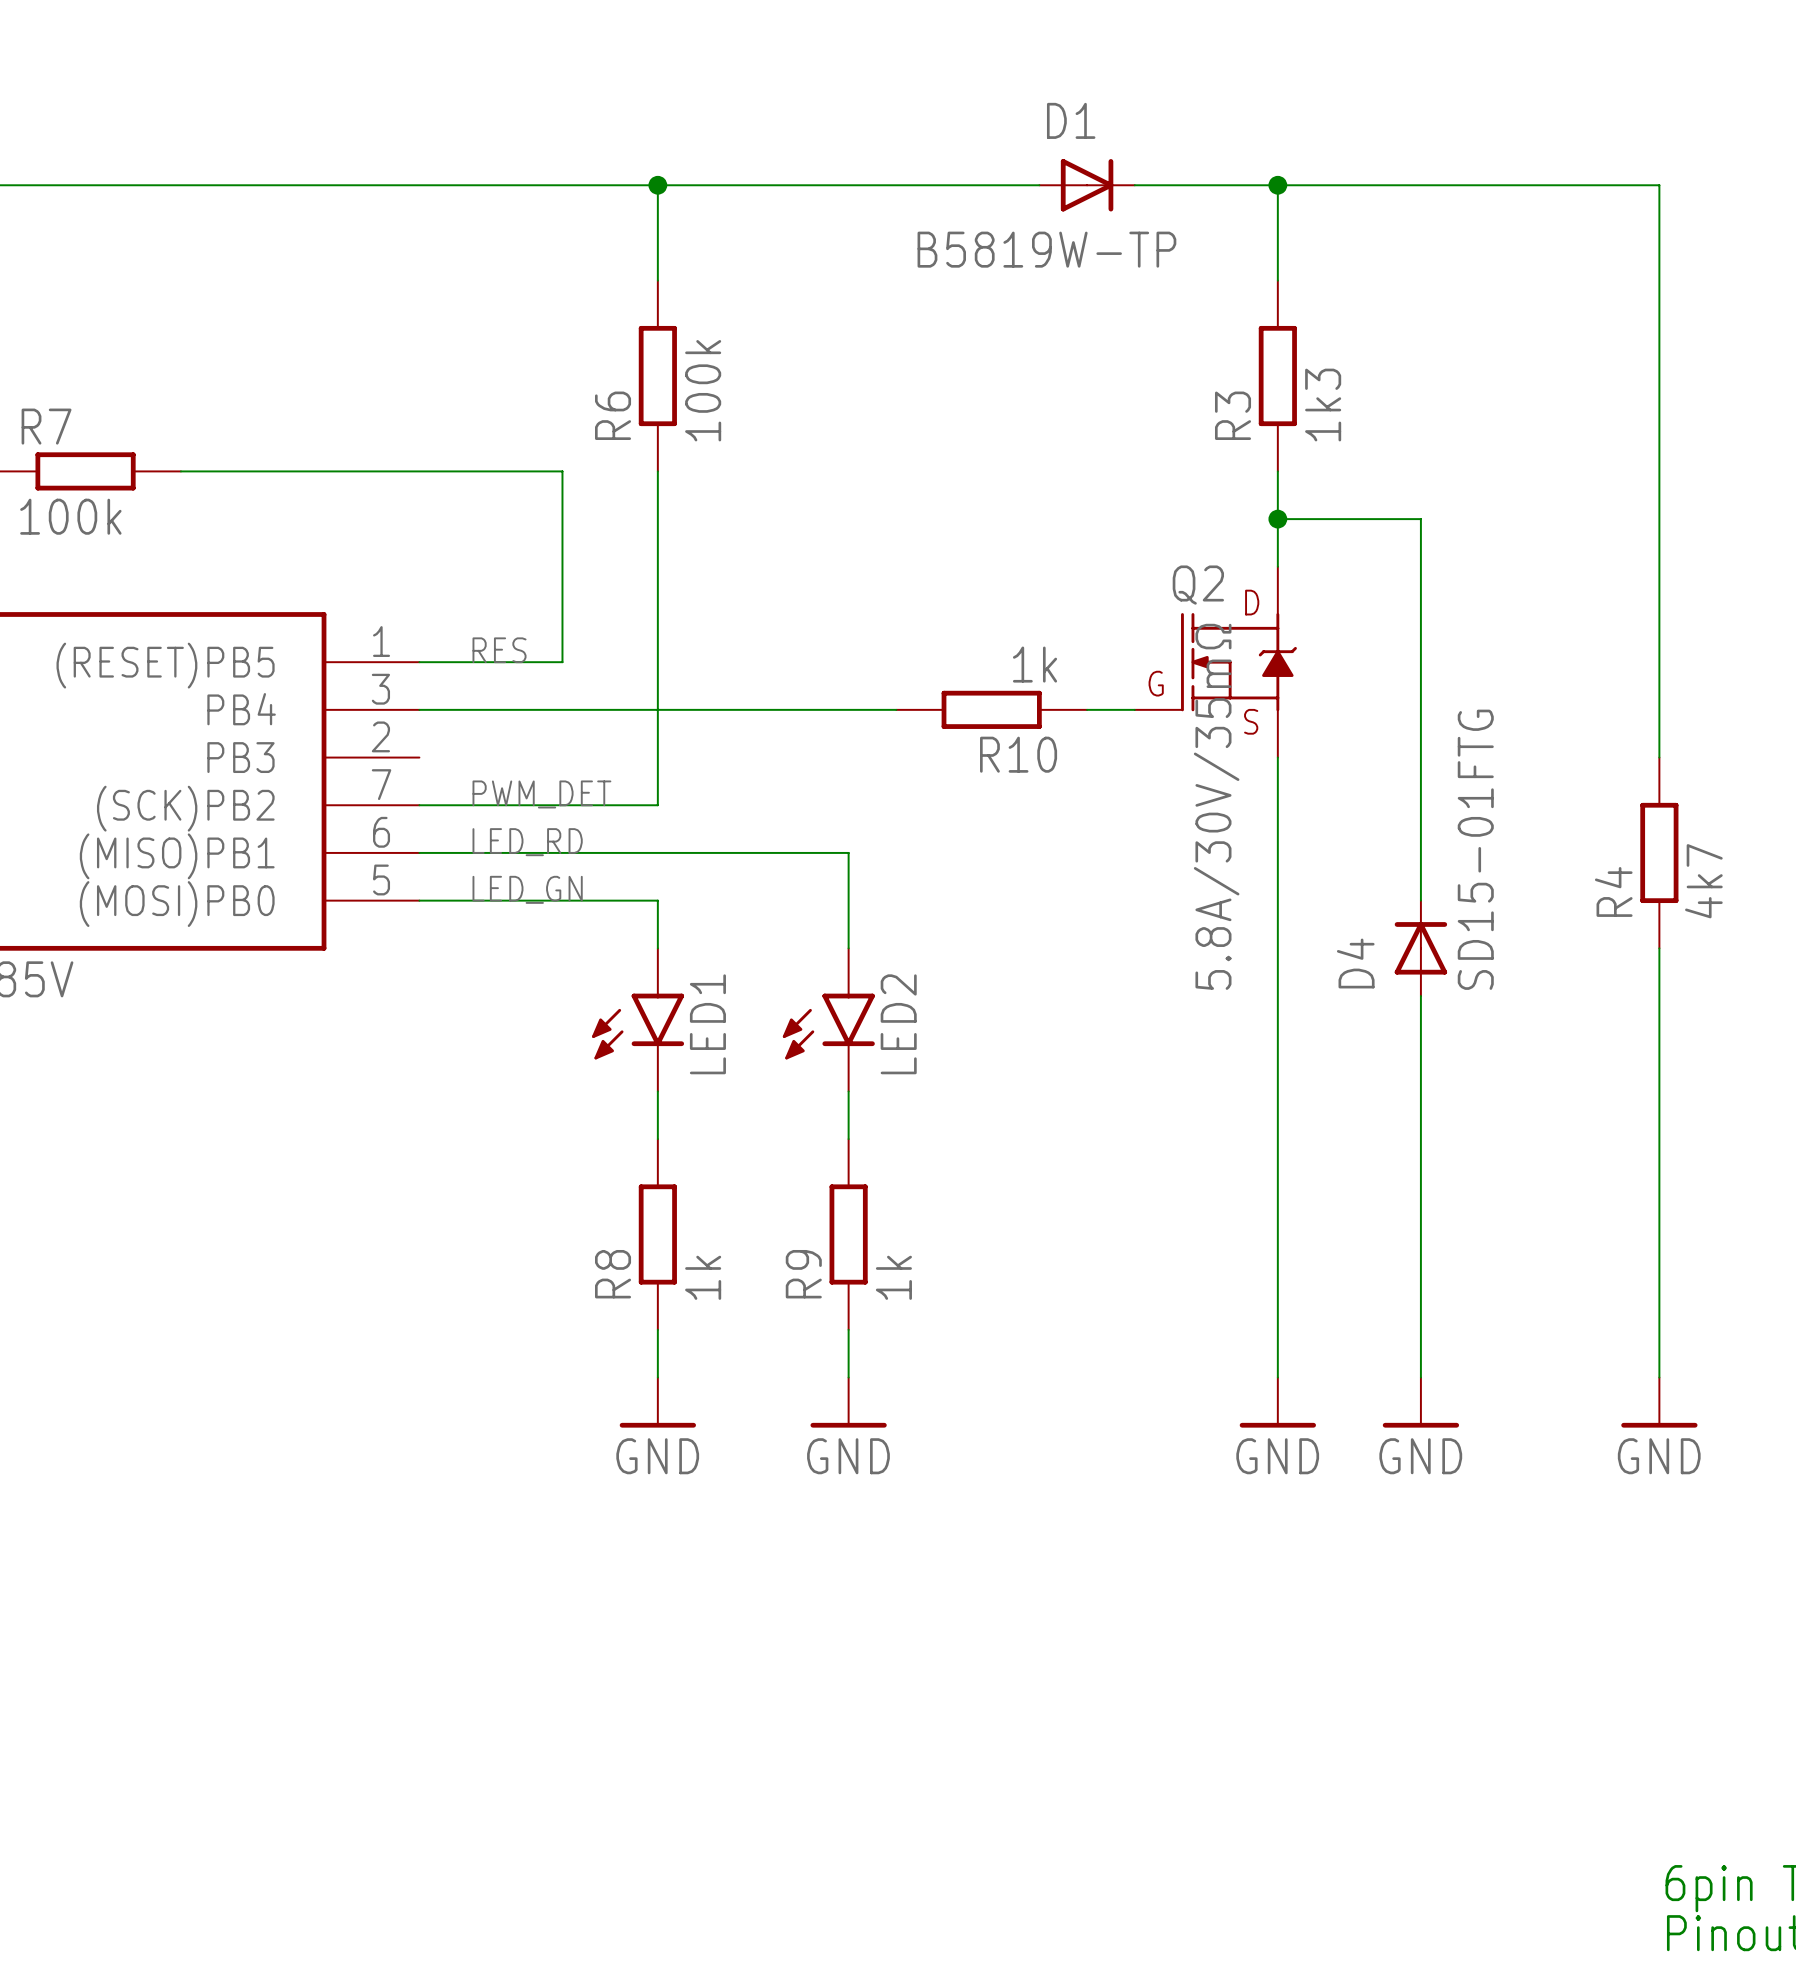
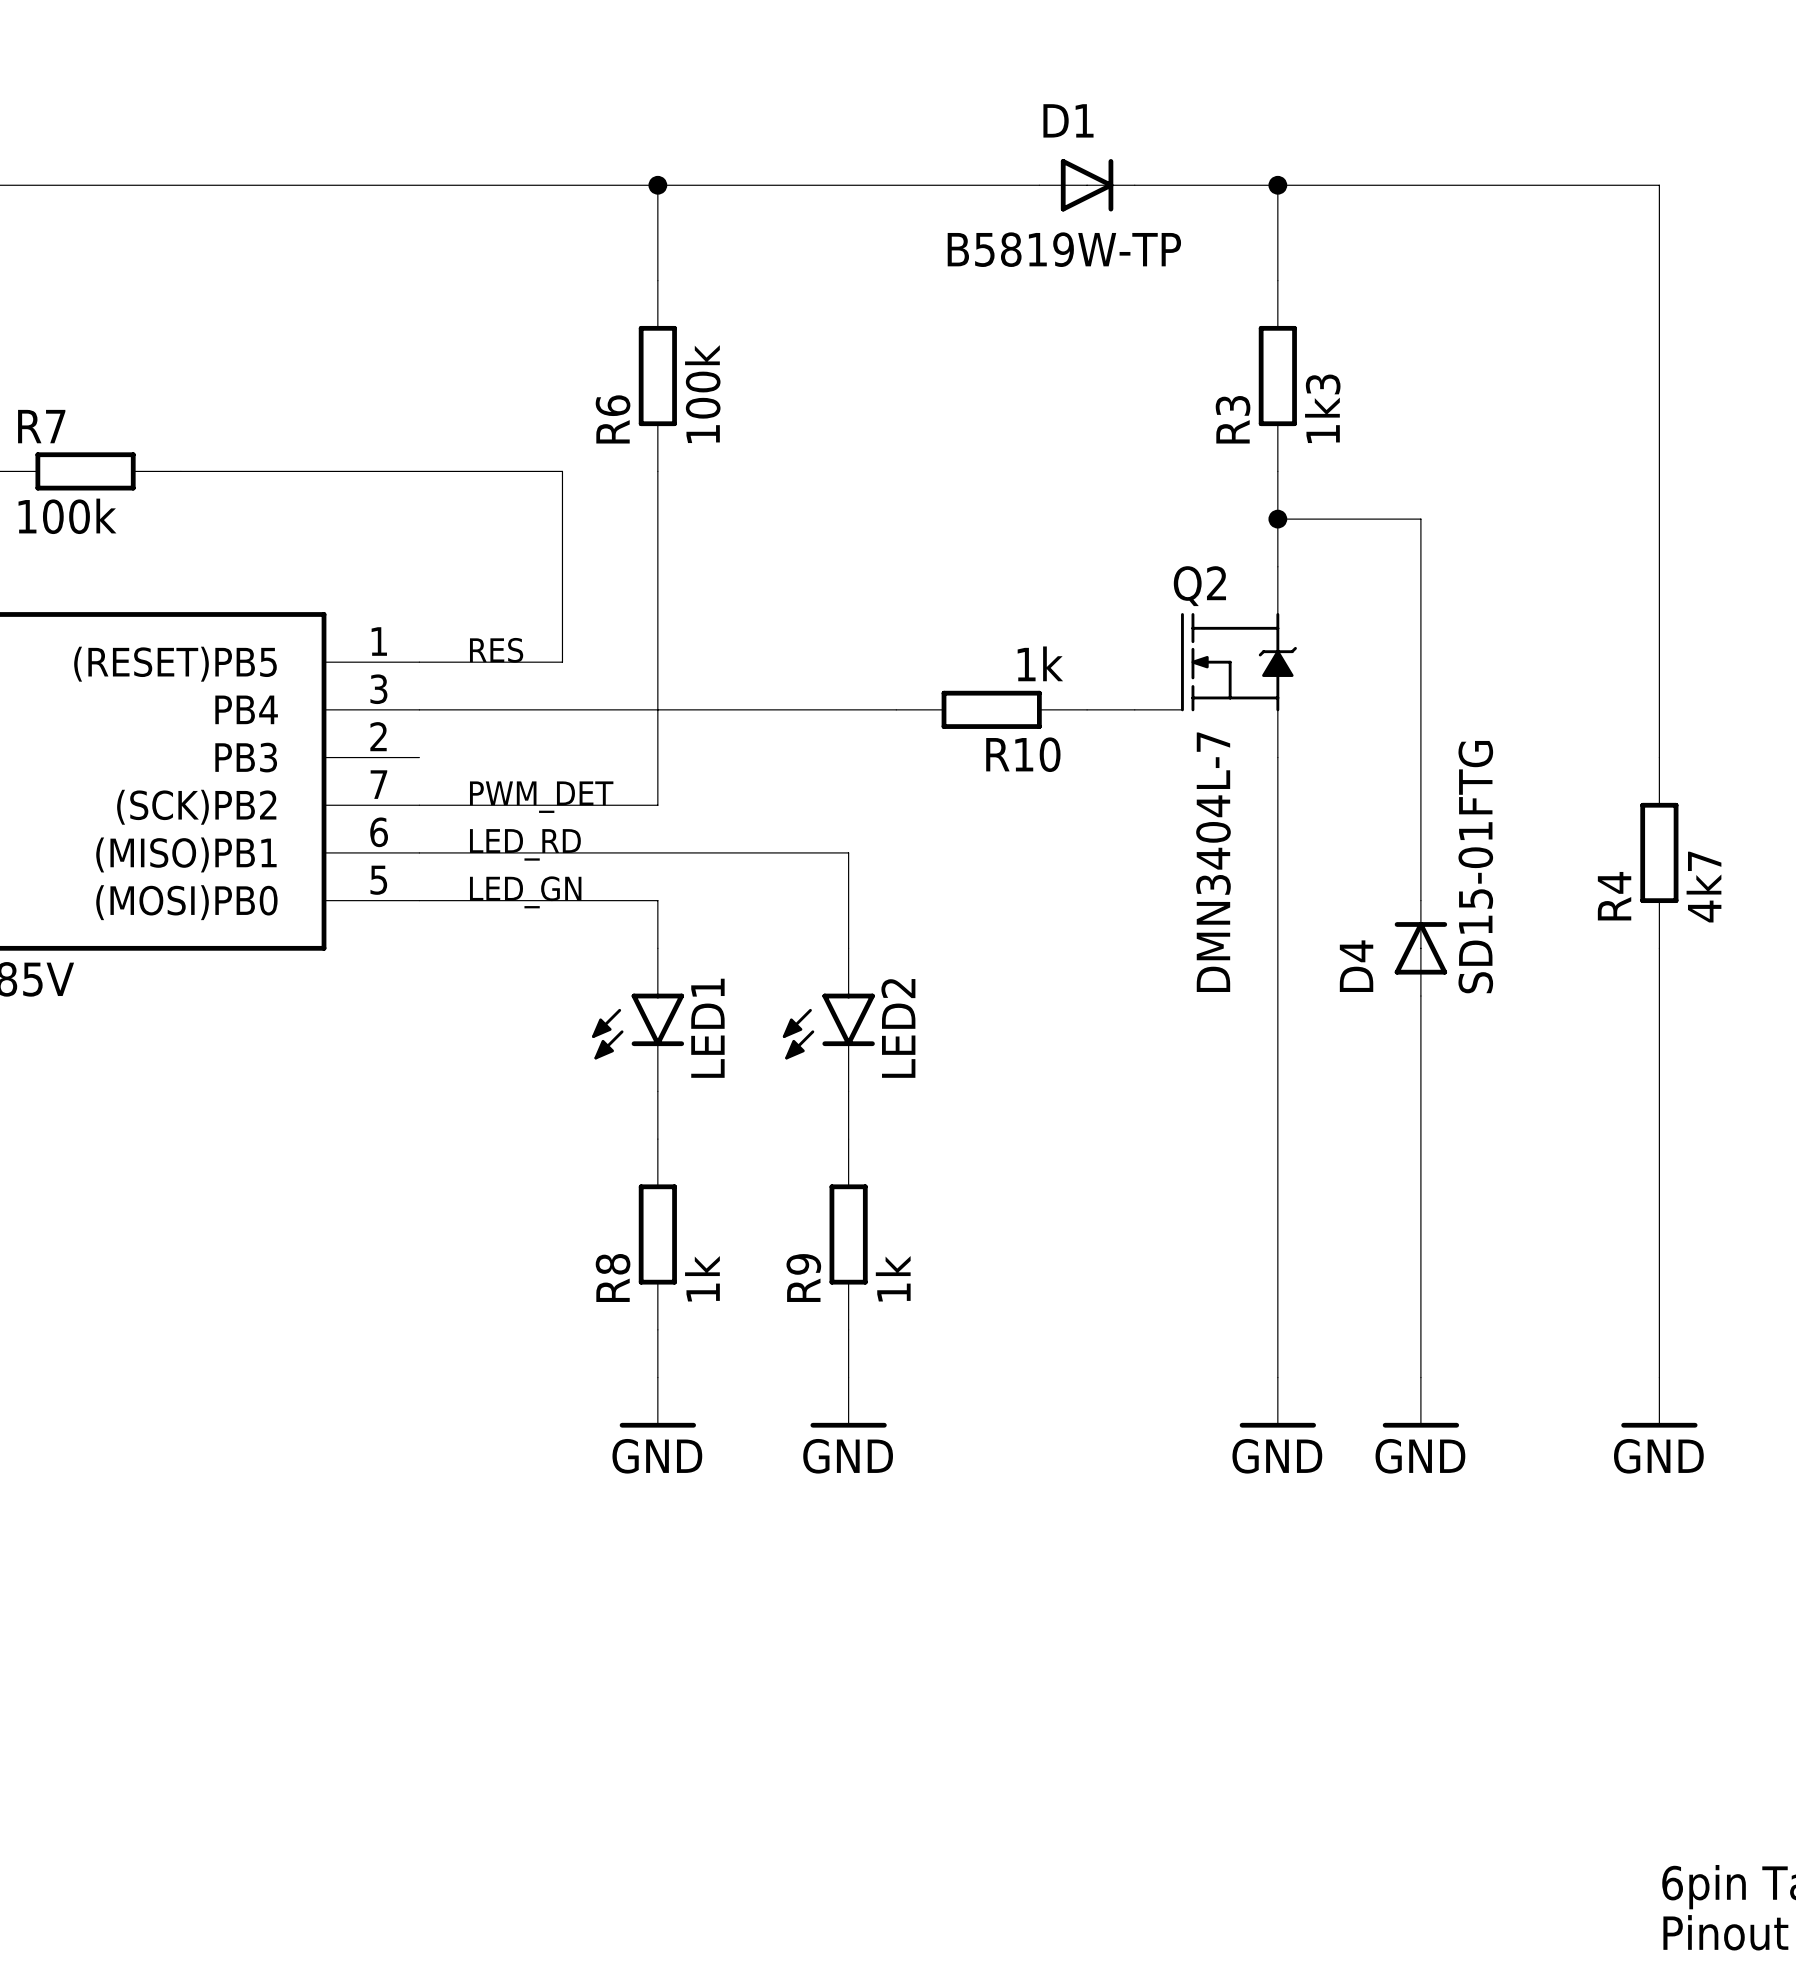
Q2 text: D (1252, 602) -> none
Q2 text: G (1156, 683) -> none
Q2 text: S (1251, 721) -> none
Q2 value: 5.8A/30V/35mΩ (1216, 806) -> DMN3404L-7 (1213, 862)

